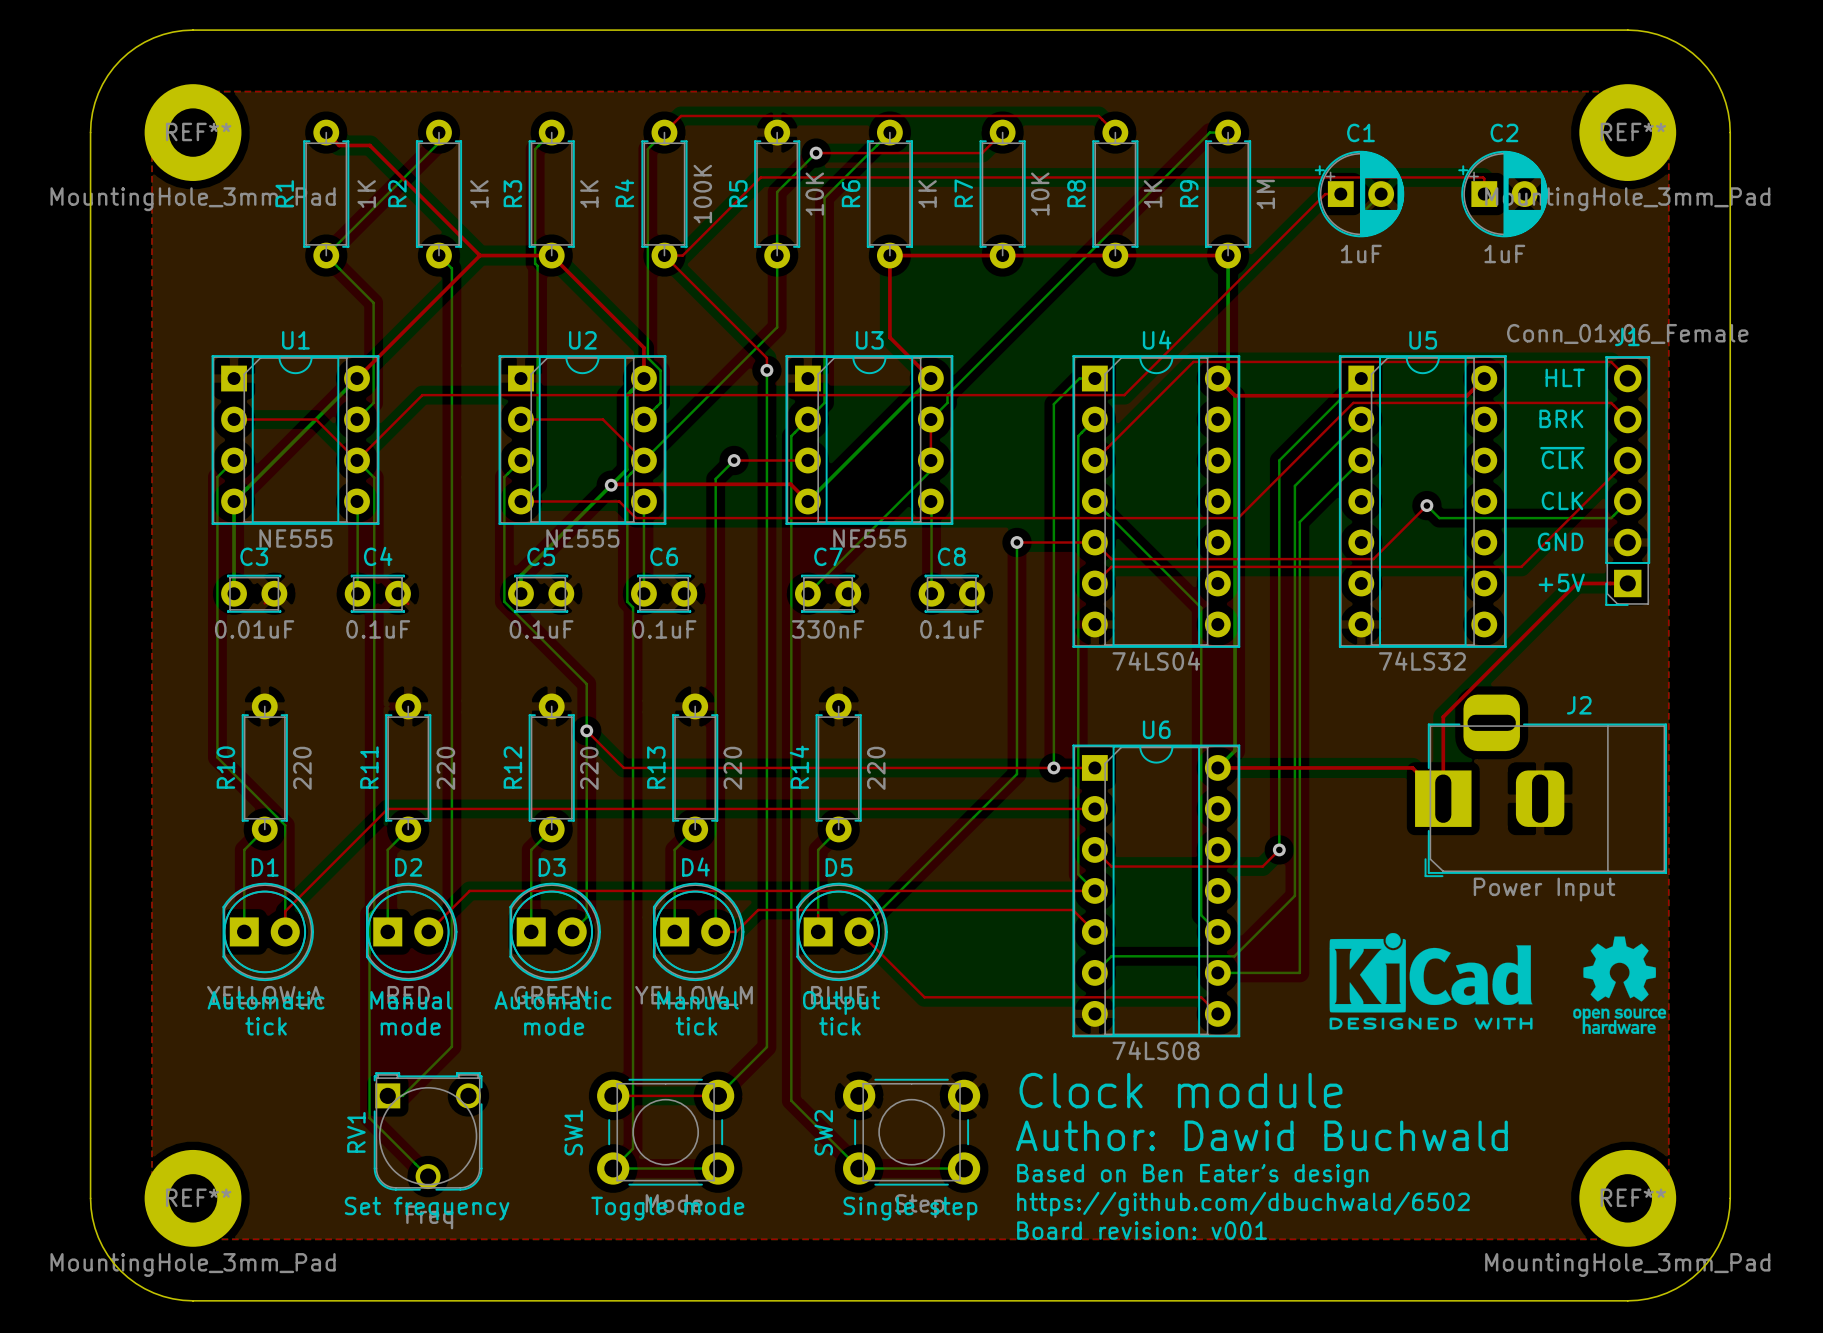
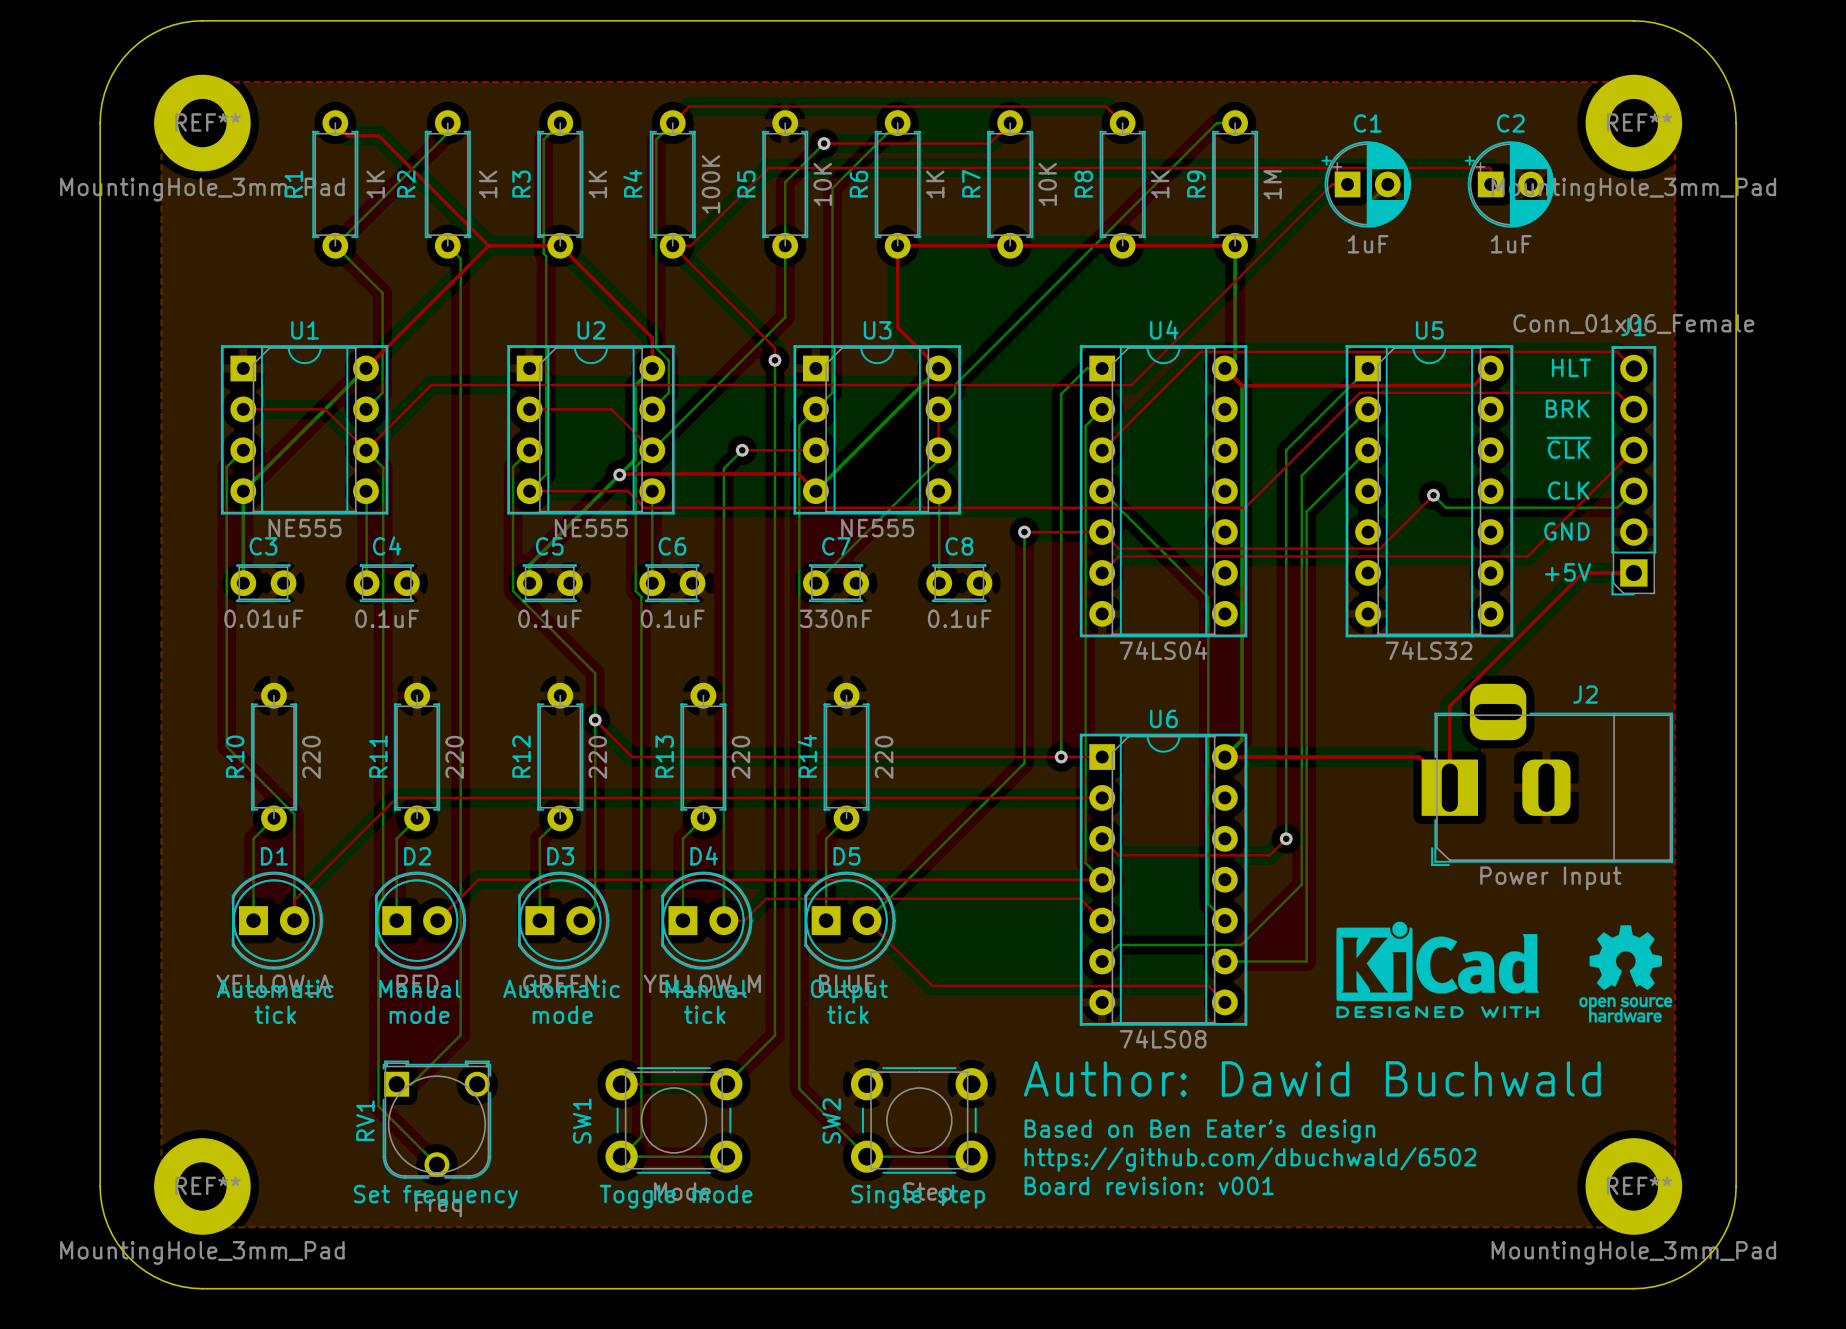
text: Clock module (1180, 1090) -> Author: Dawid Buchwald (1312, 1078)
text: Author: Dawid Buchwald (1261, 1135) -> Based on Ben Eater’s design (1199, 1131)
text: Based on Ben Eater’s design (1192, 1175) -> https://github.com/dbuchwald/6502 (1250, 1159)
text: https://github.com/dbuchwald/6502 (1243, 1204) -> Board revision: v001 (1149, 1185)
text: Board revision: v001 (1142, 1230) -> none

